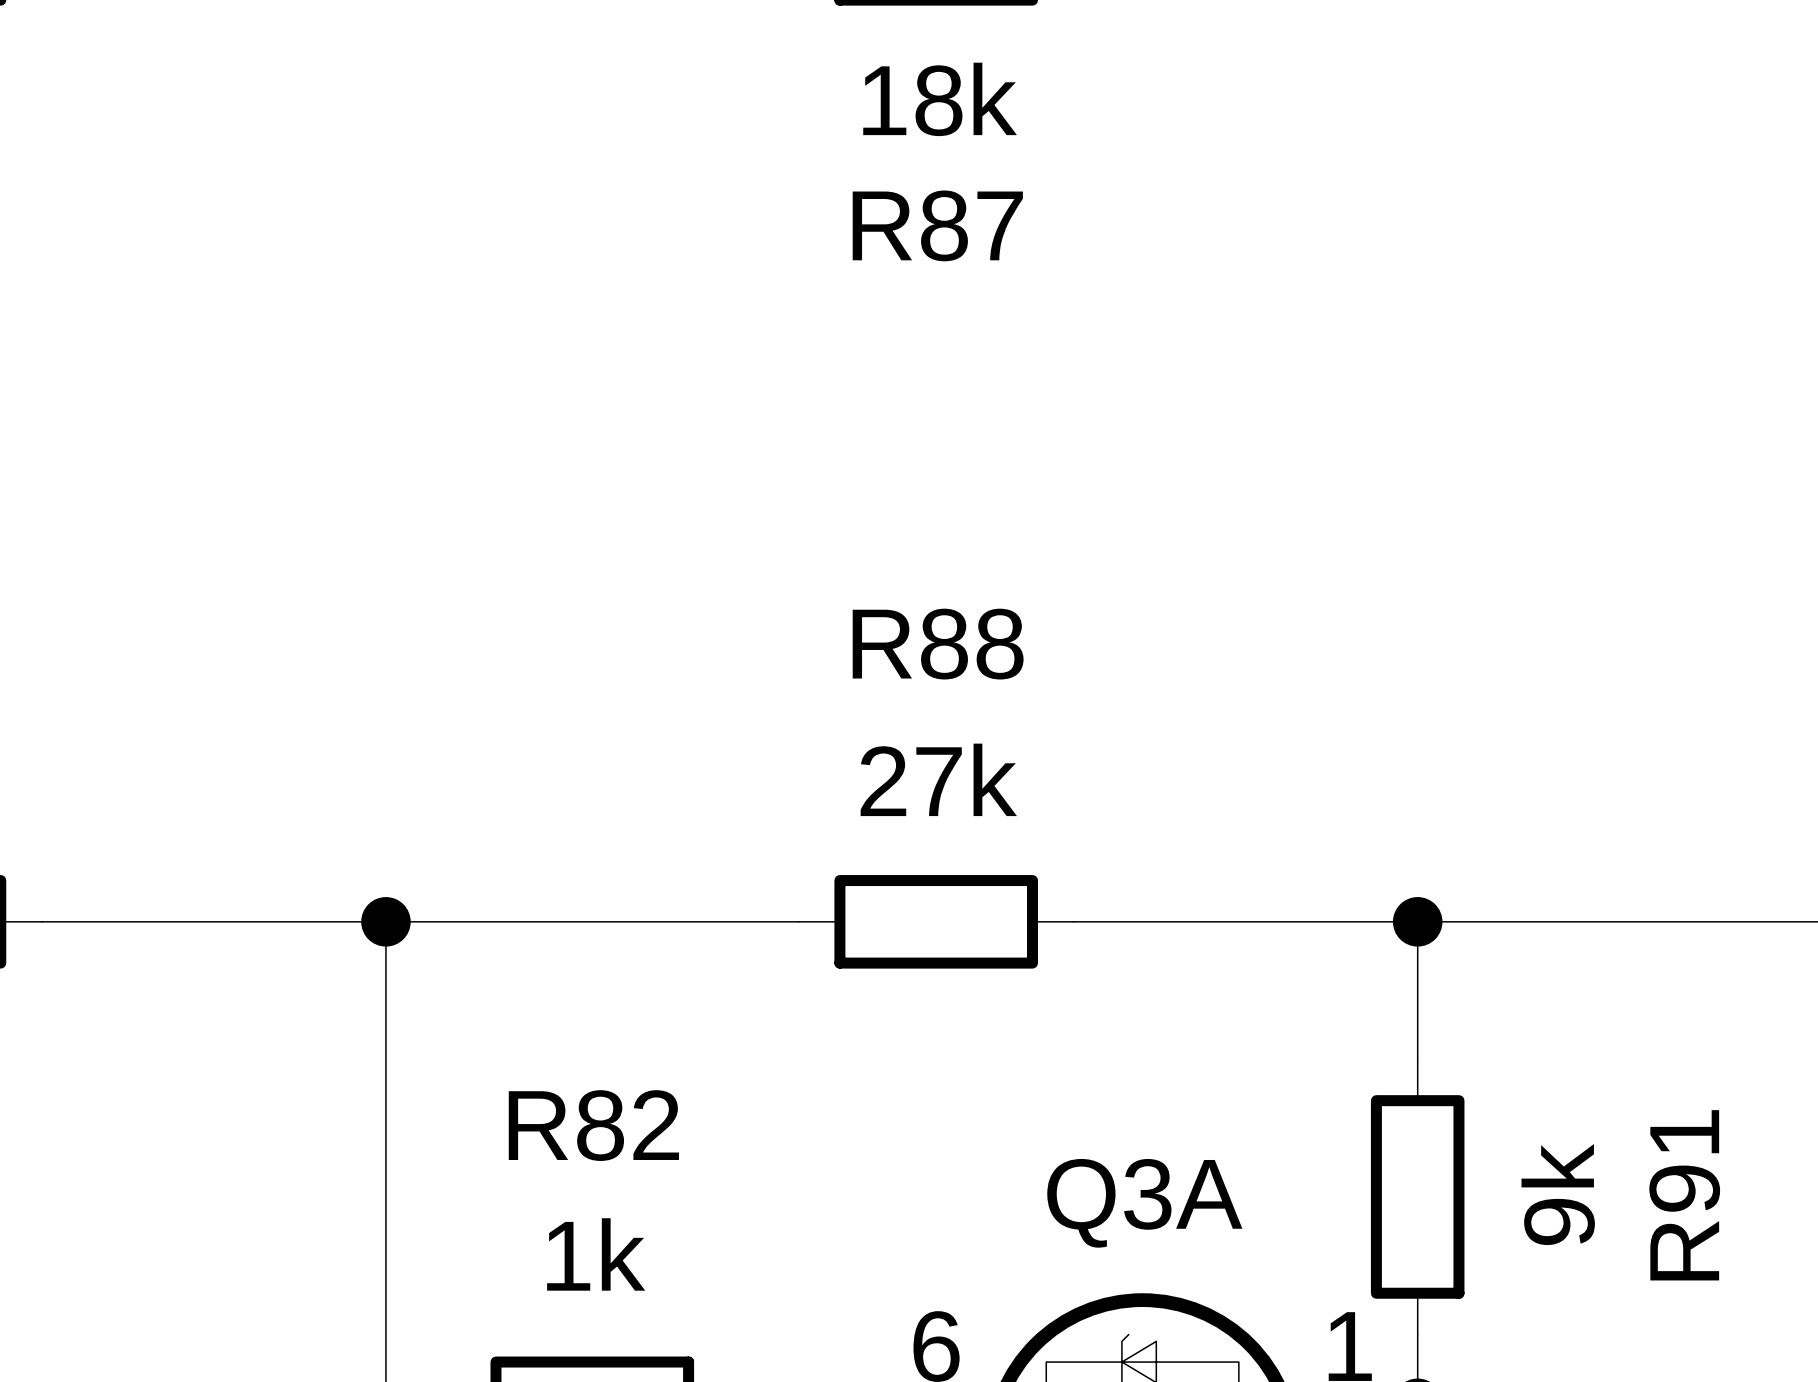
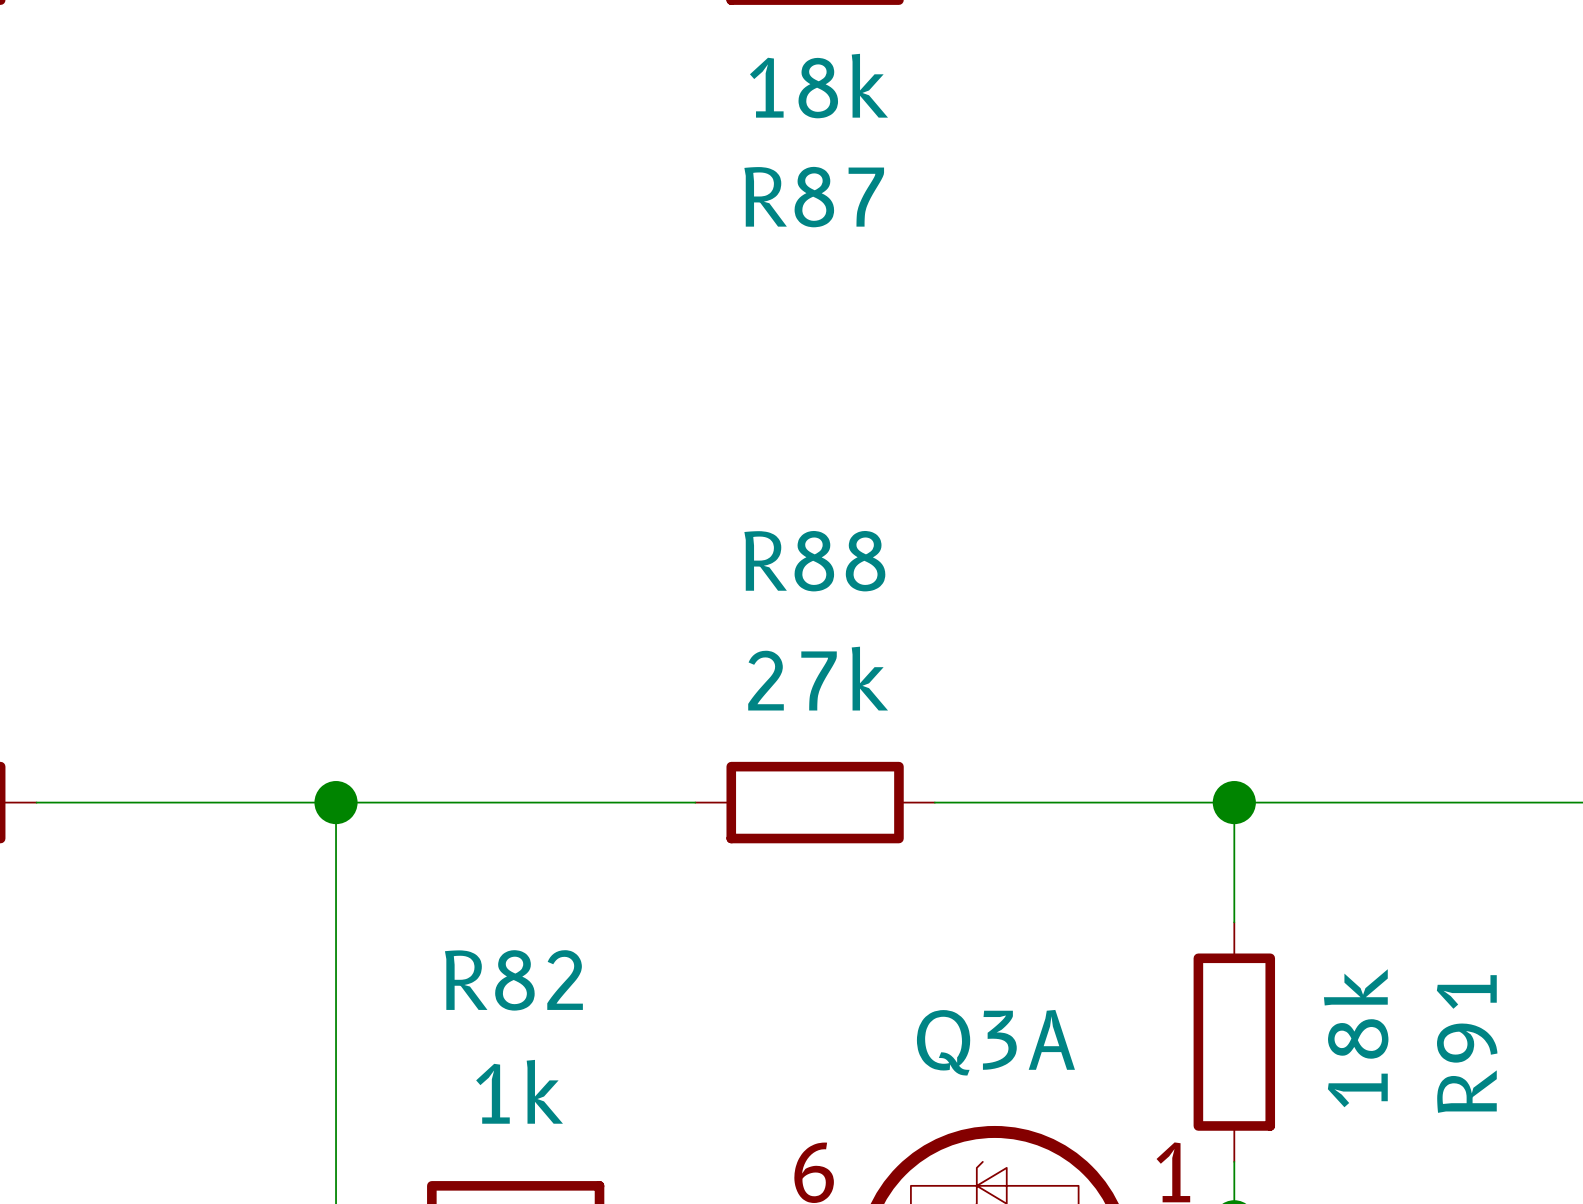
R91 value: 9k (1558, 1194) -> 18k (1356, 1038)

